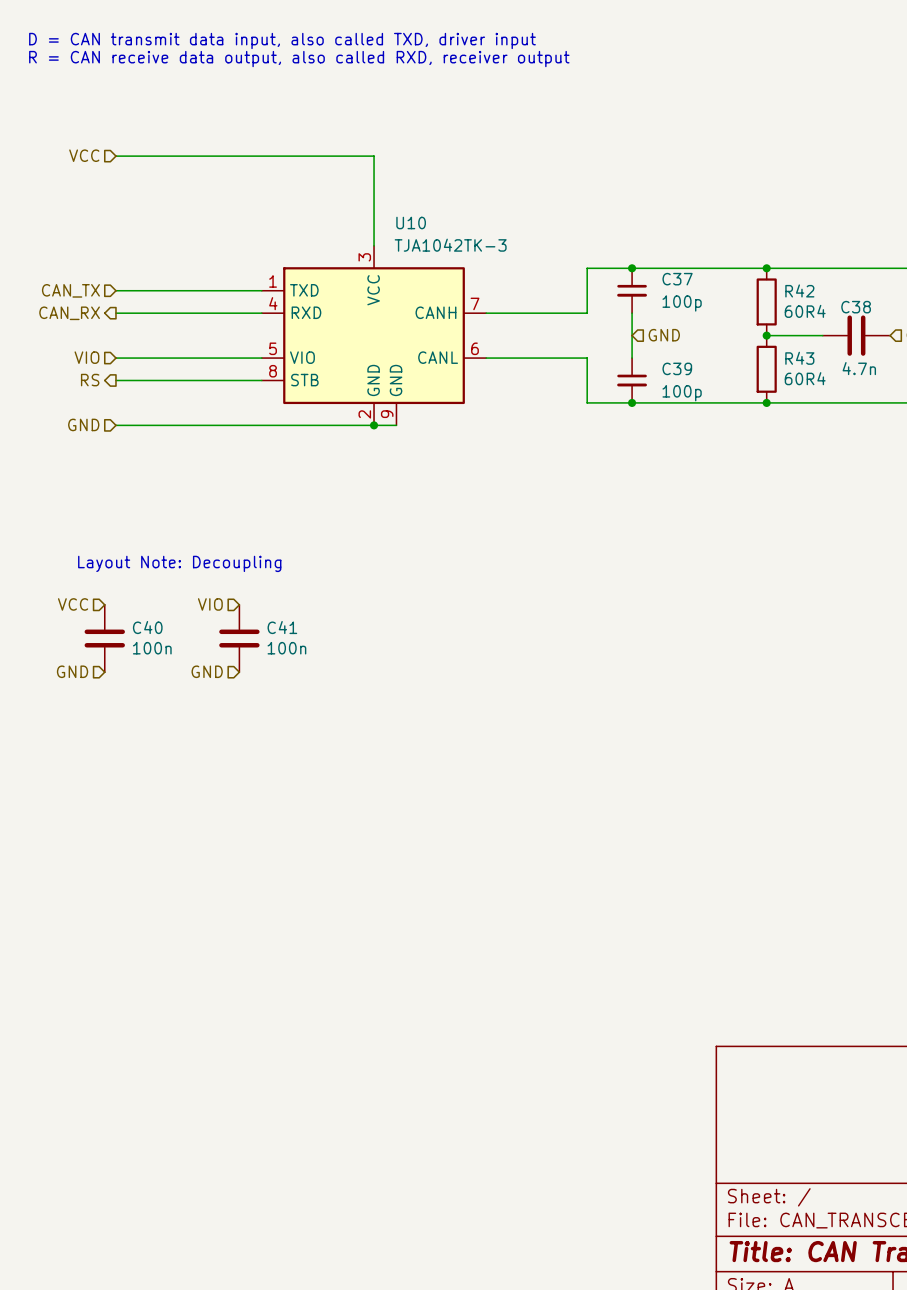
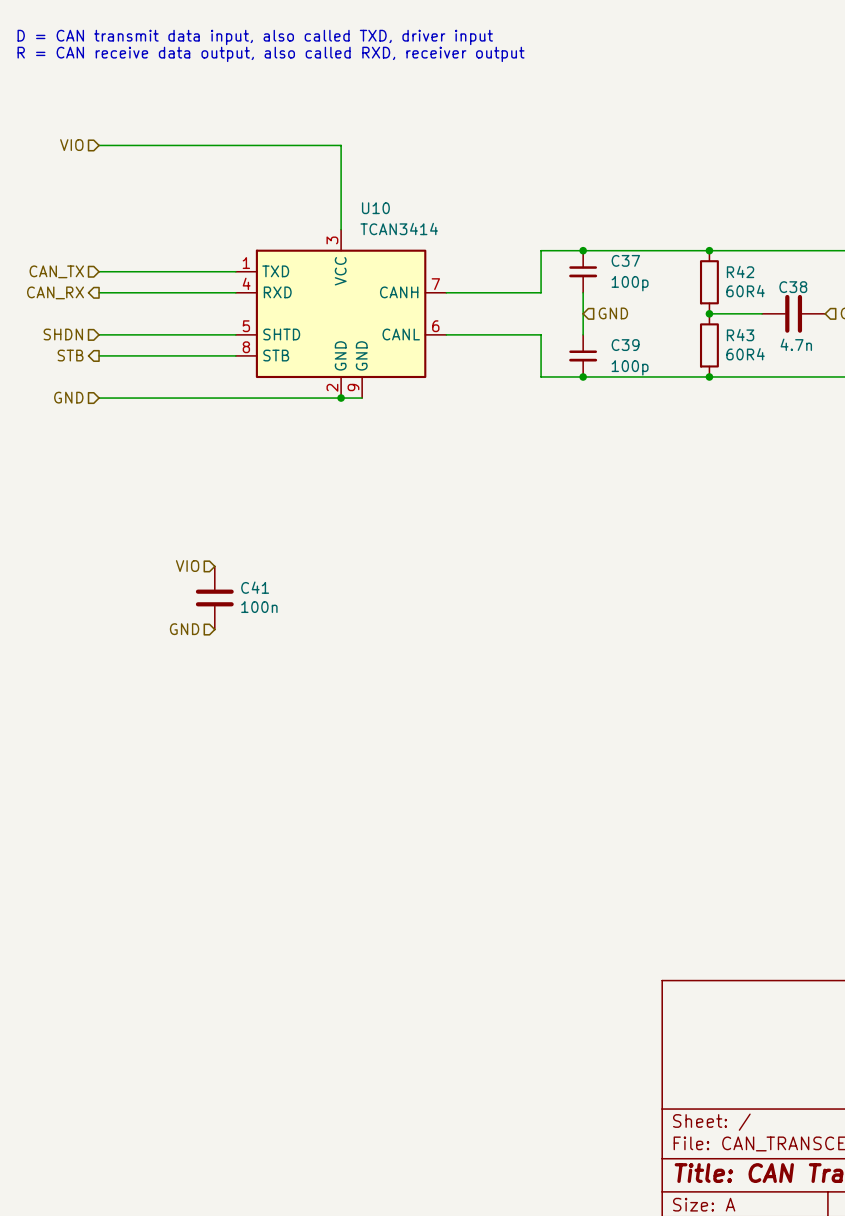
hierarchical label: VCC (84, 155) -> VIO (71, 145)
U10 value: TJA1042TK-3 (450, 245) -> TCAN3414 (399, 229)
hierarchical label: VIO (86, 357) -> SHDN (63, 334)
U10 pin name: VIO (302, 357) -> SHTD (281, 334)
hierarchical label: RS (90, 380) -> STB (70, 355)
text: Layout Note: Decoupling (179, 563) -> none
hierarchical label: VCC (73, 604) -> none
C40: 100n (104, 638) -> none
hierarchical label: GND (72, 671) -> none

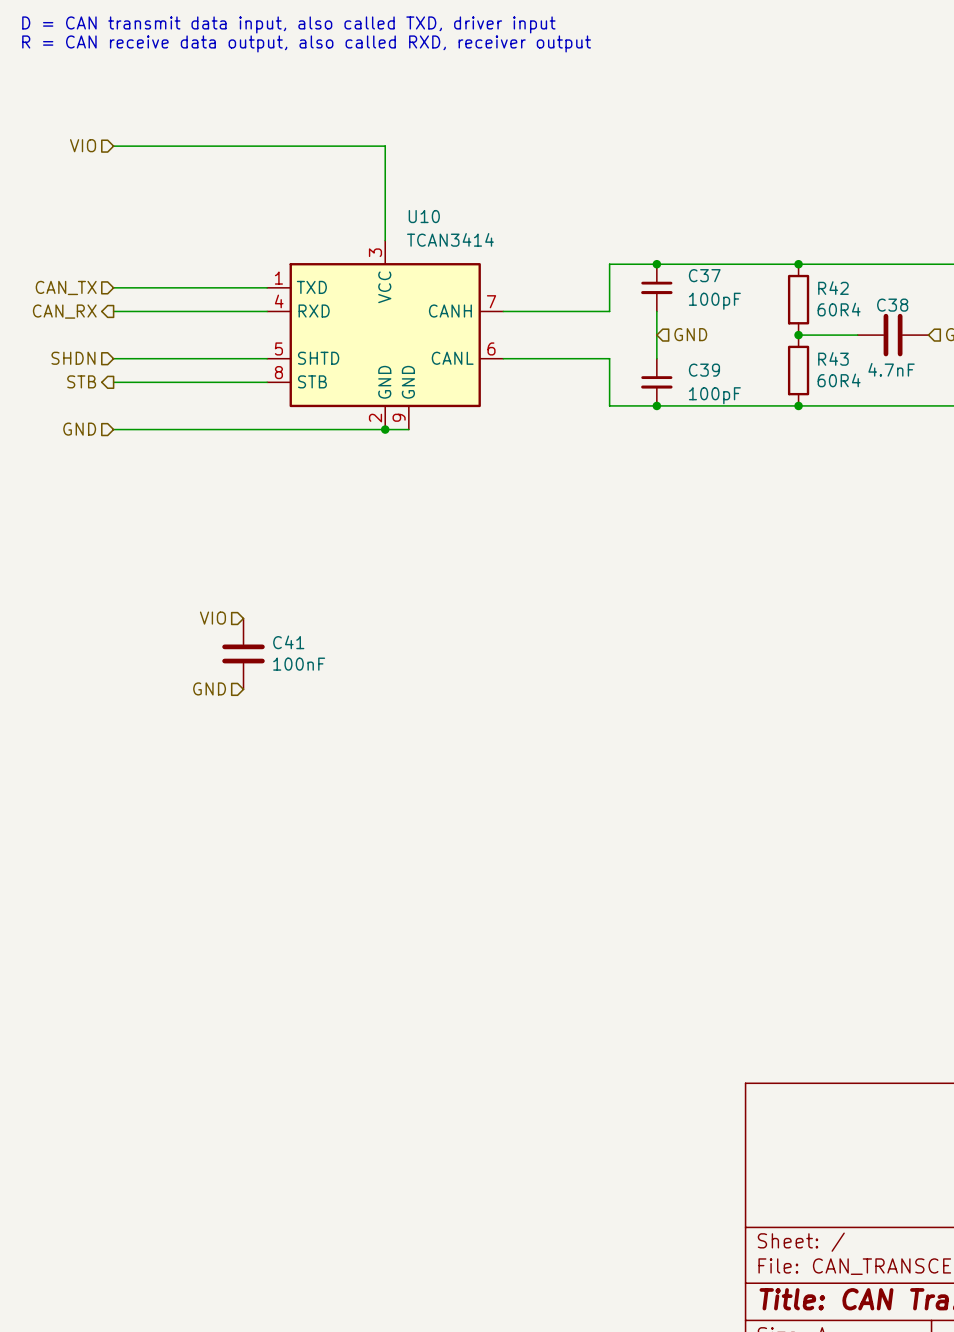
C37 value: 100p (630, 283) -> 100pF (714, 301)
C38 value: 4.7n (796, 344) -> 4.7nF (891, 369)
C39 value: 100p (630, 367) -> 100pF (714, 395)
C41 value: 100n (259, 607) -> 100nF (299, 664)

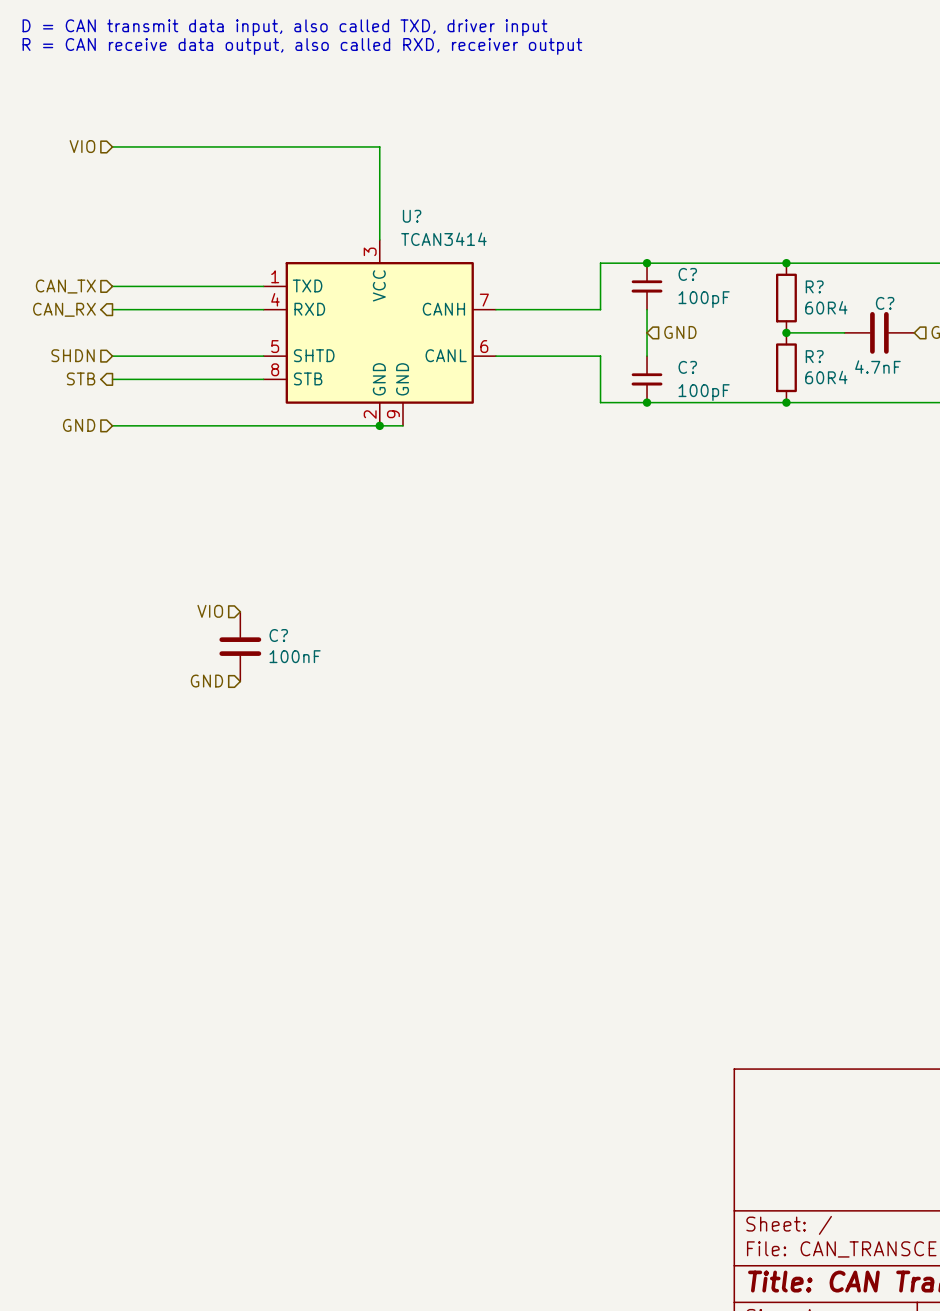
U10 name: U10 (424, 216) -> U? (412, 216)
C37 name: C37 (704, 275) -> C? (687, 274)
R42 name: R42 (833, 288) -> R? (814, 286)
C38 name: C38 (892, 305) -> C? (885, 303)
R43 name: R43 (833, 358) -> R? (814, 356)
C39 name: C39 (704, 370) -> C? (687, 367)
C41 name: C41 (288, 642) -> C? (278, 635)

